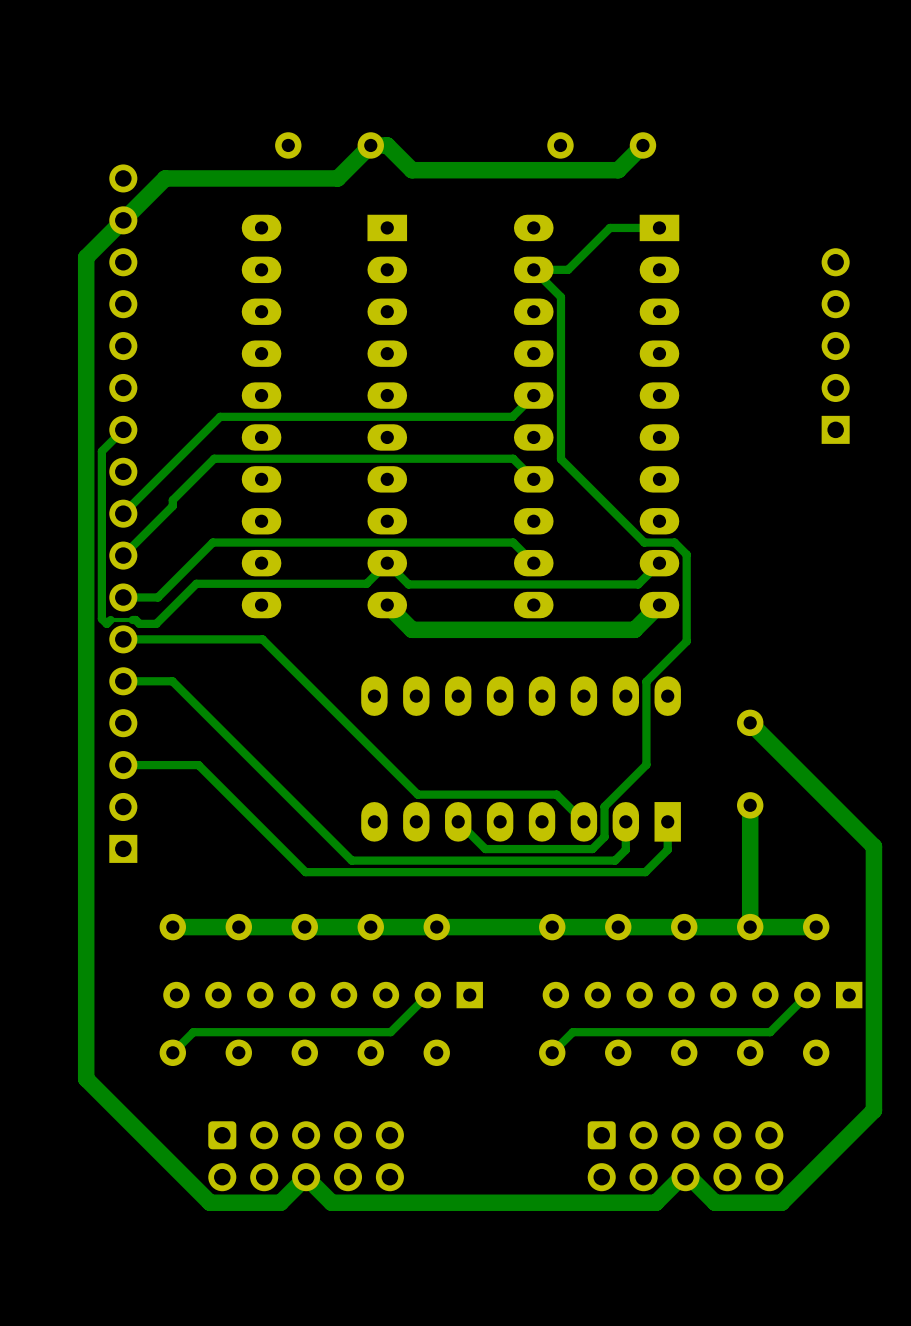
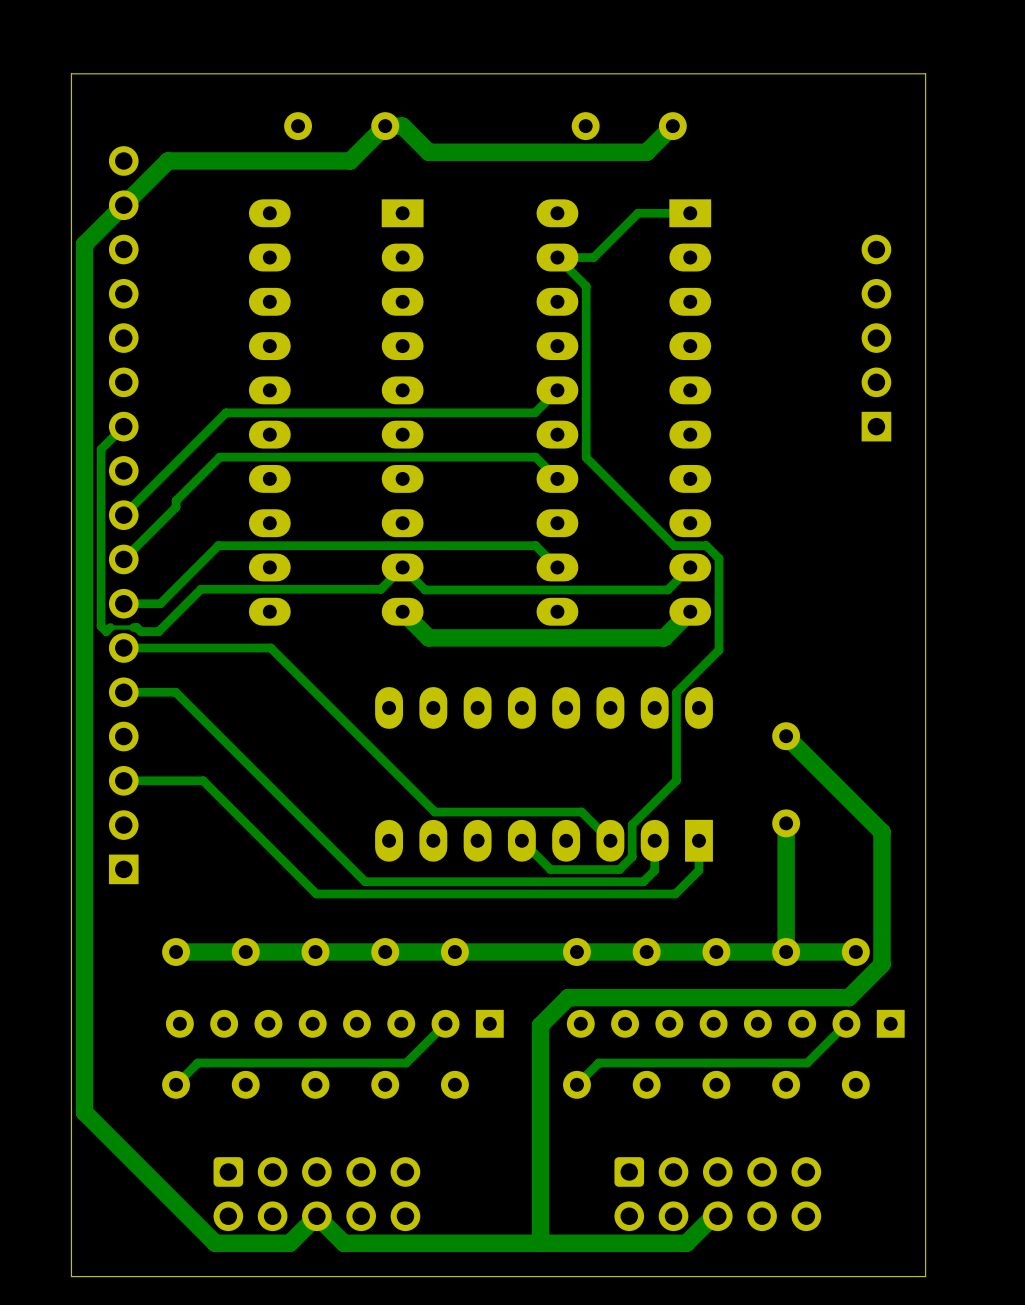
board edge: none -> (925, 73) (925, 1276) (71, 1276) (71, 73) (925, 73)
track: (840, 813) (873, 846) (873, 1110) (781, 1202) (715, 1202) (689, 1177) (685, 1177) -> (882, 832) (882, 964) (848, 997) (568, 997) (540, 1025) (540, 1243)
track: (458, 821) (485, 849) (527, 849) -> (521, 840) (550, 869)

